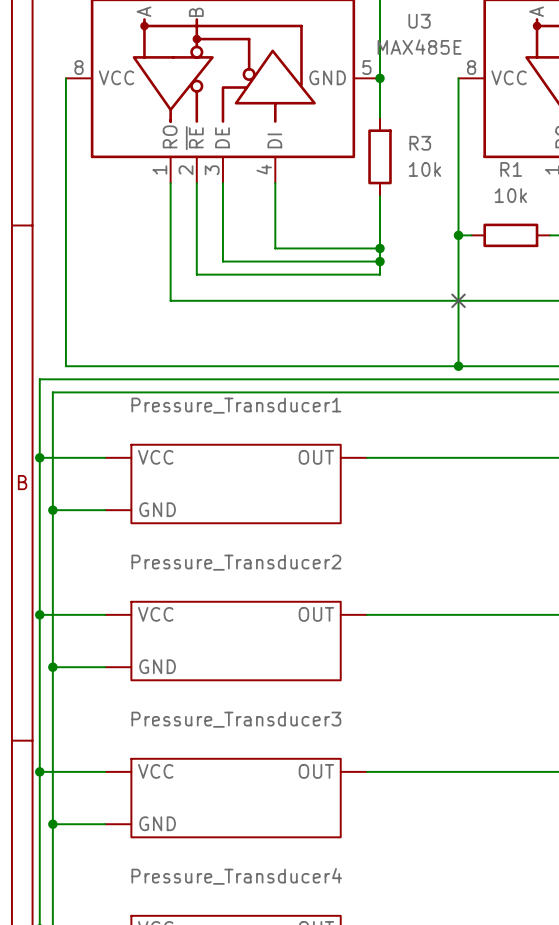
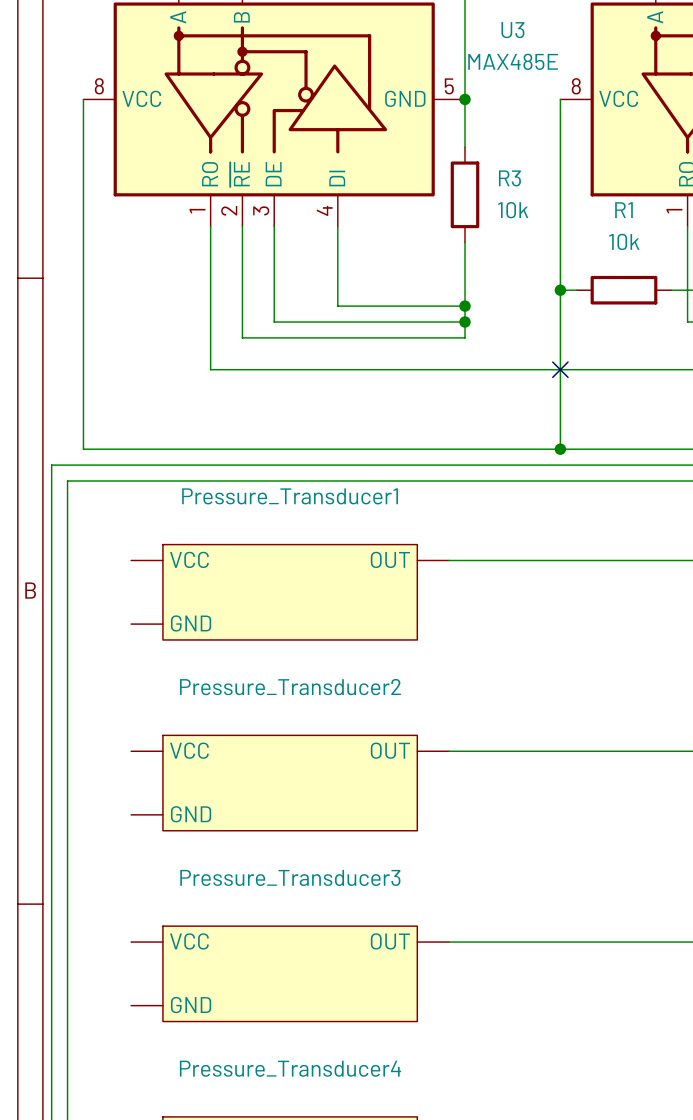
wire: (39, 457) (105, 457) -> none
junction: (39, 457) -> none
wire: (52, 510) (105, 510) -> none
junction: (52, 510) -> none
wire: (39, 614) (105, 614) -> none
junction: (39, 614) -> none
wire: (52, 667) (105, 667) -> none
junction: (52, 667) -> none
wire: (39, 771) (105, 771) -> none
junction: (39, 771) -> none
wire: (52, 824) (105, 824) -> none
junction: (52, 824) -> none

